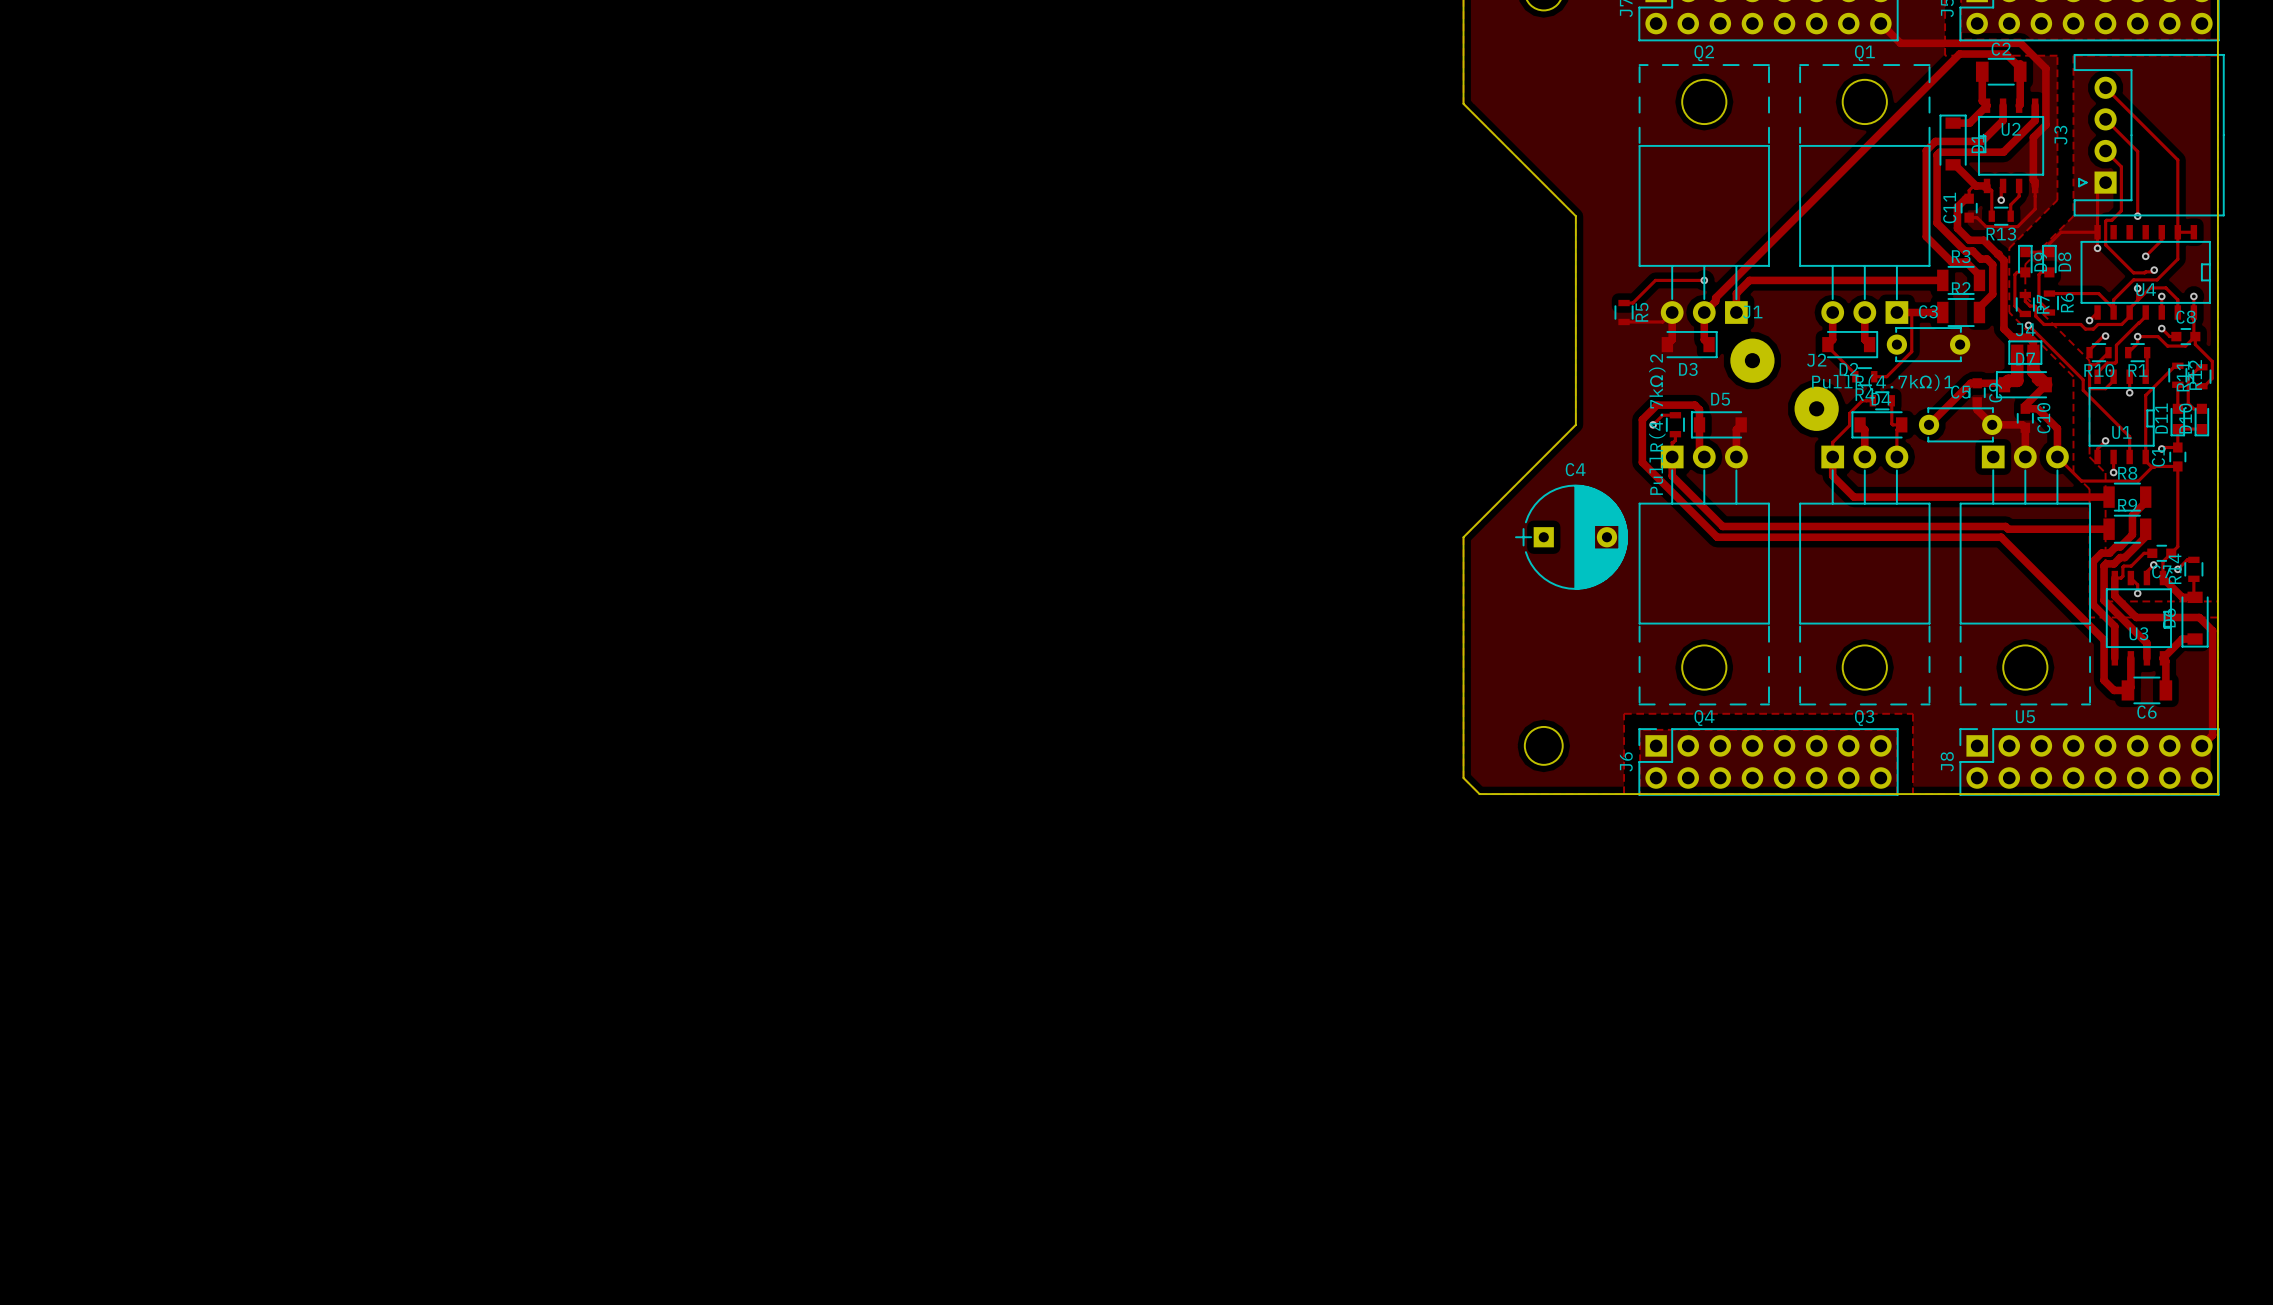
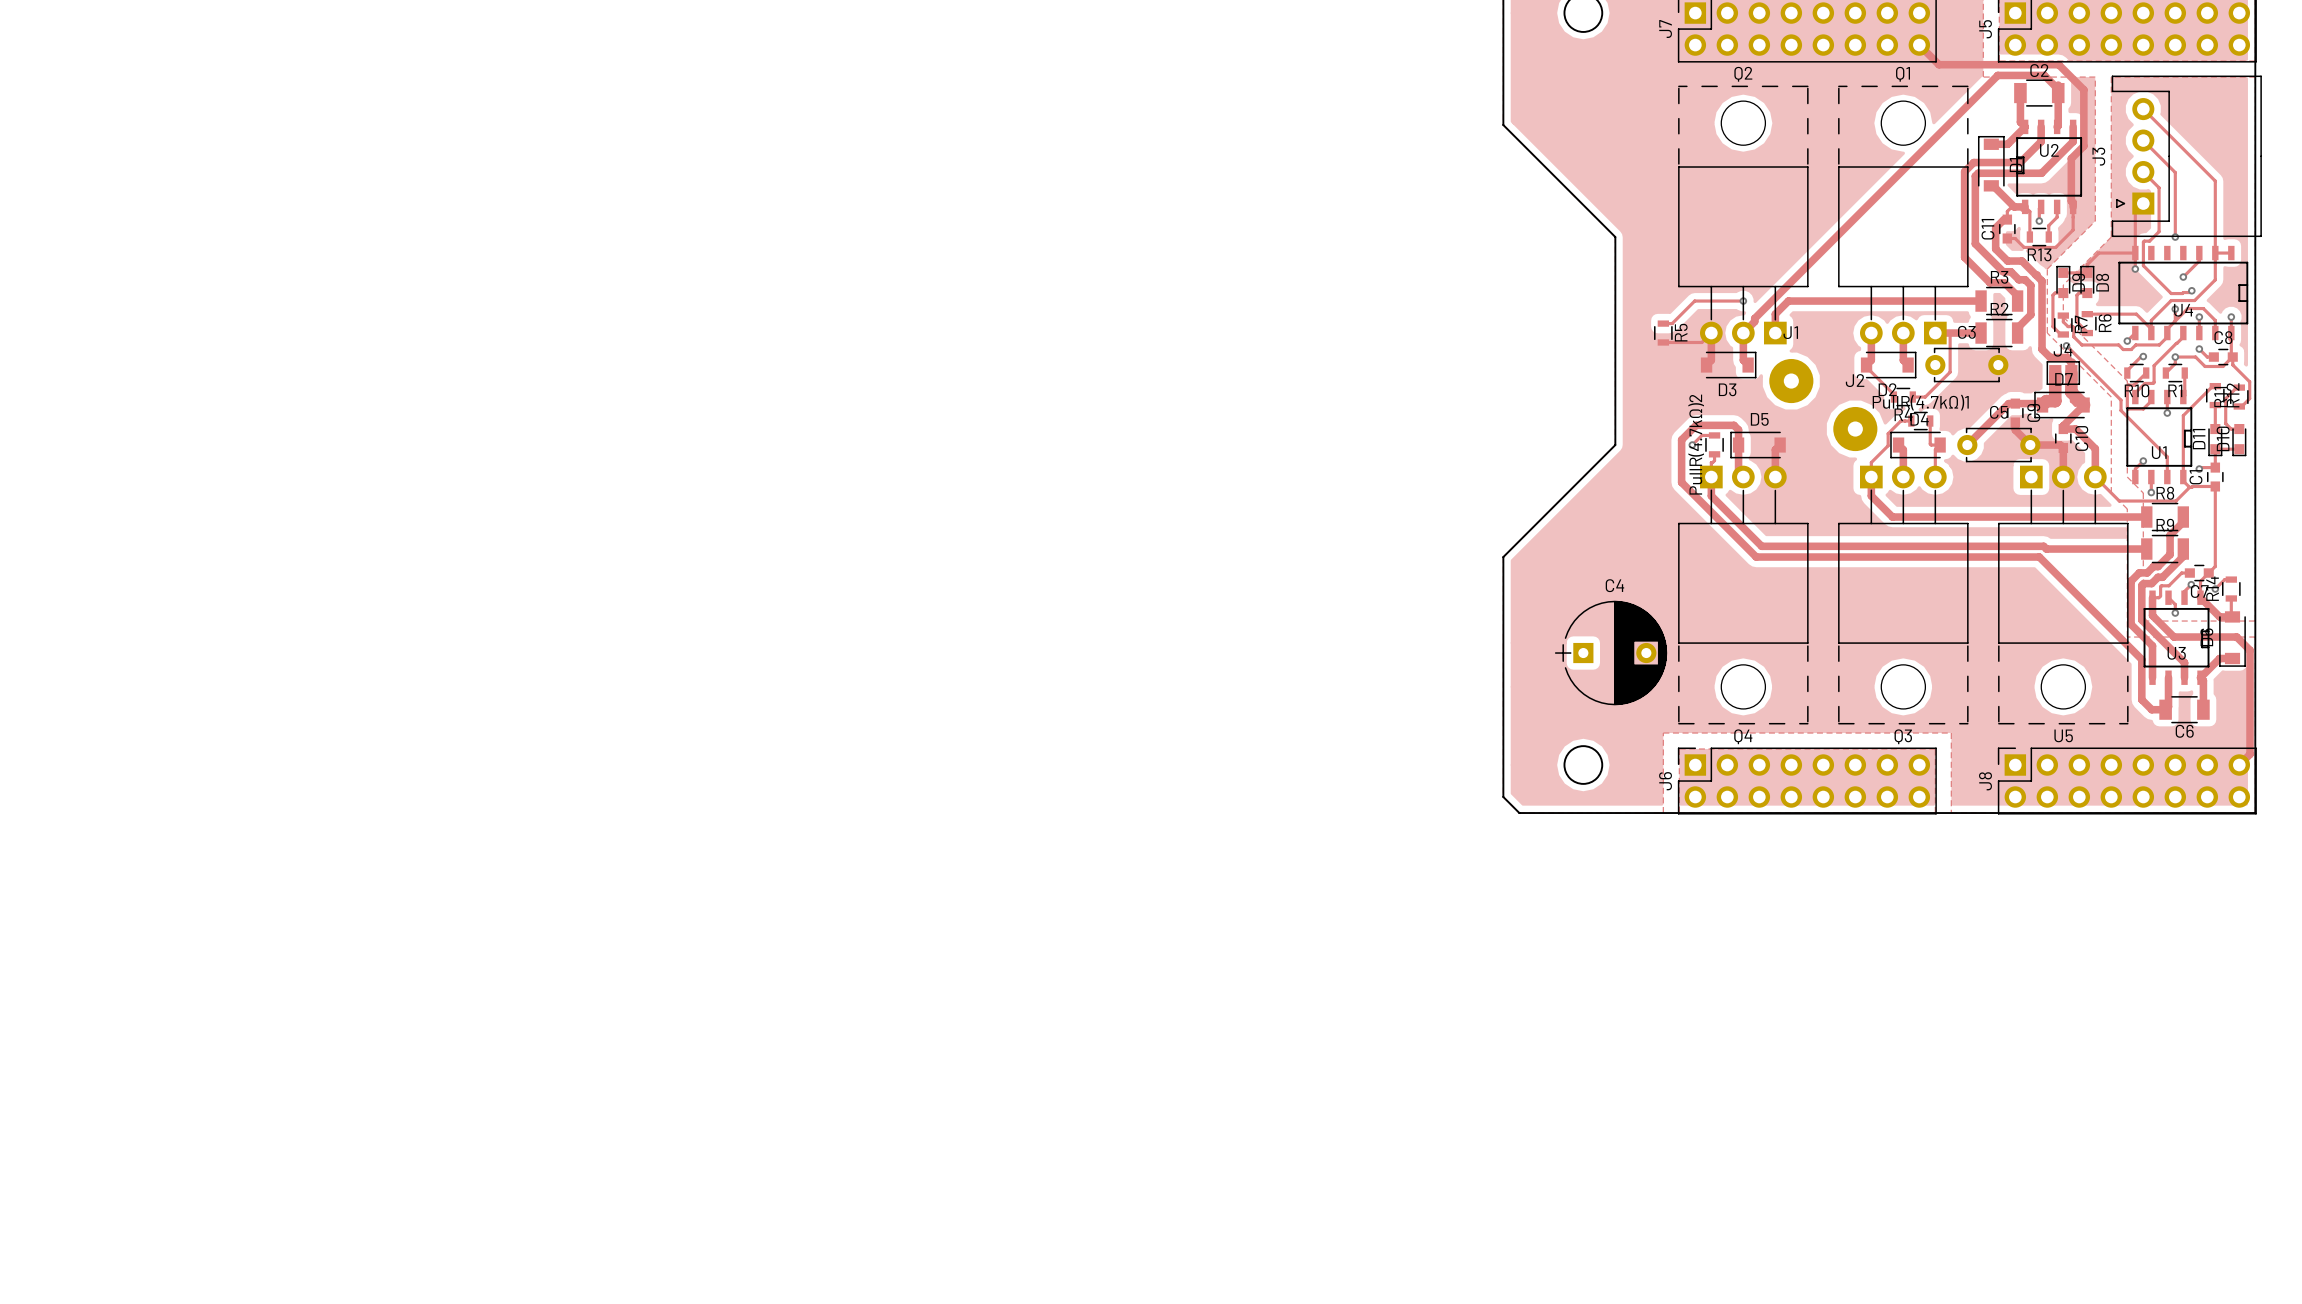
C4 position: (1571, 537) -> (1611, 653)

